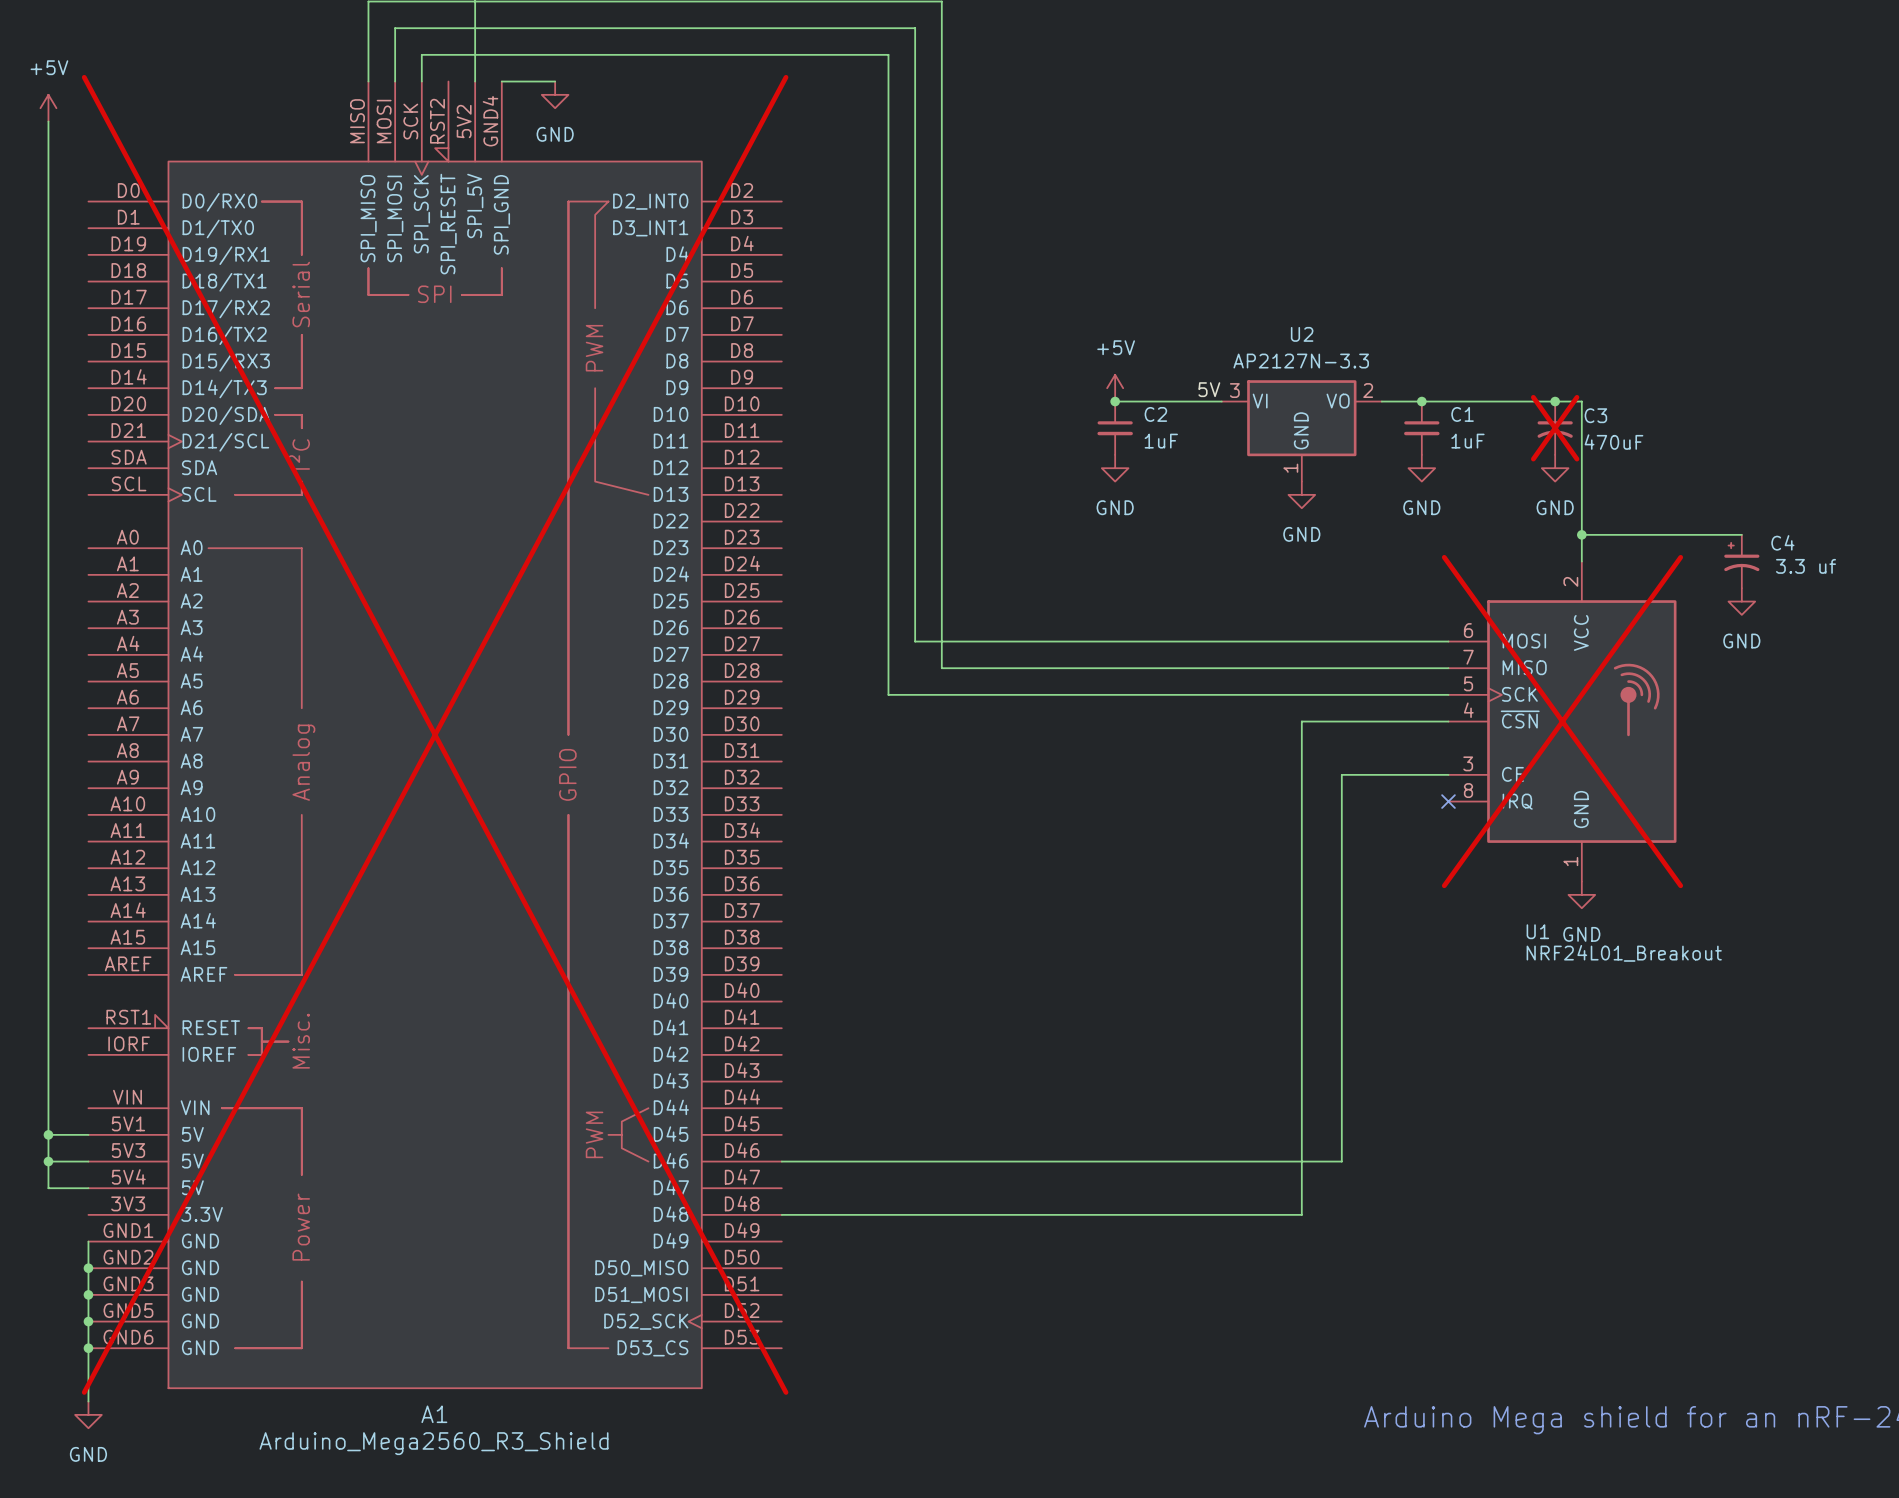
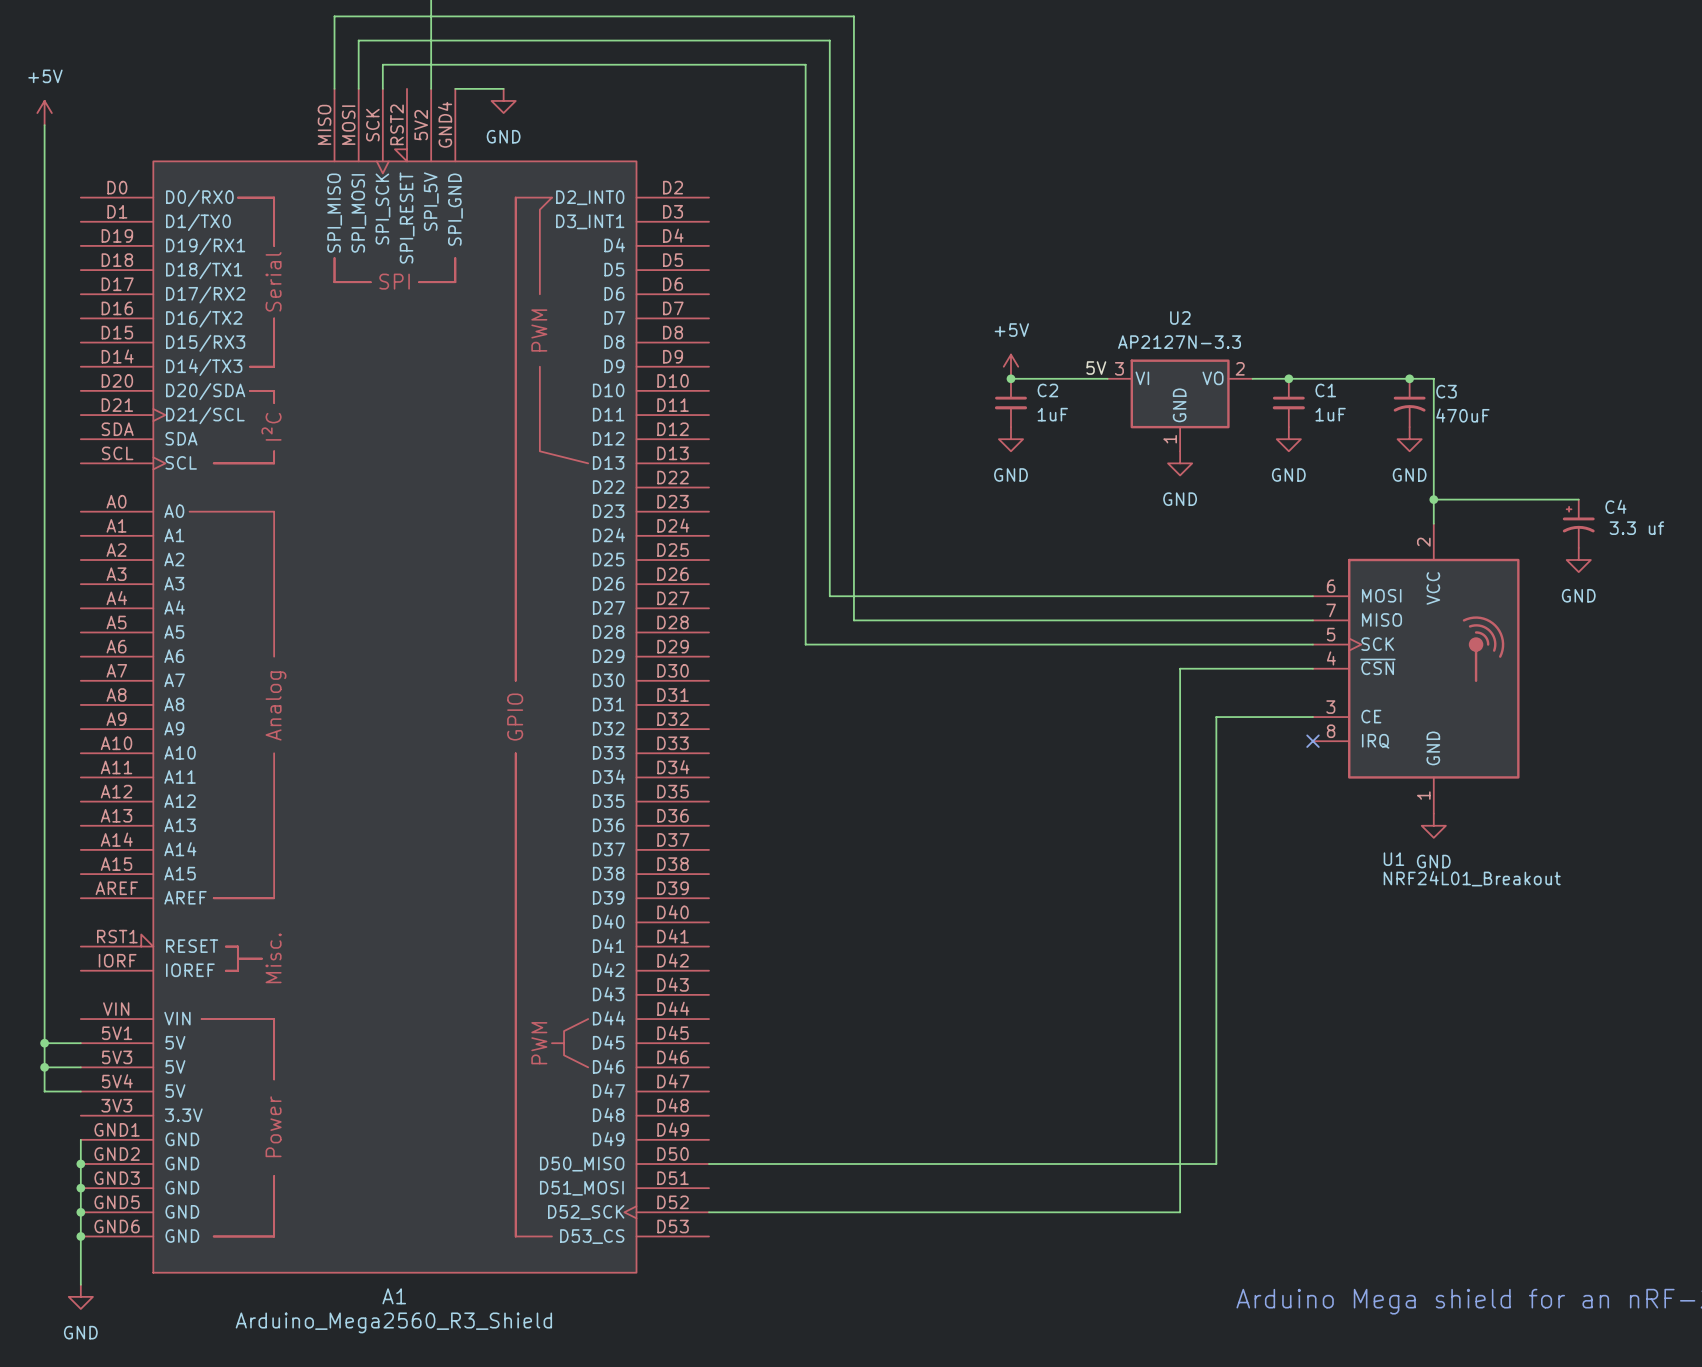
C3 do-not-place cross: (1555, 428) -> none
U1 do-not-place cross: (1562, 721) -> none
A1 do-not-place cross: (435, 734) -> none
wire: (781, 1161) (1341, 1161) -> (708, 1164) (1216, 1164) (1216, 1067)
wire: (781, 1214) (1301, 1214) -> (708, 1212) (1180, 1212) (1180, 1115)

